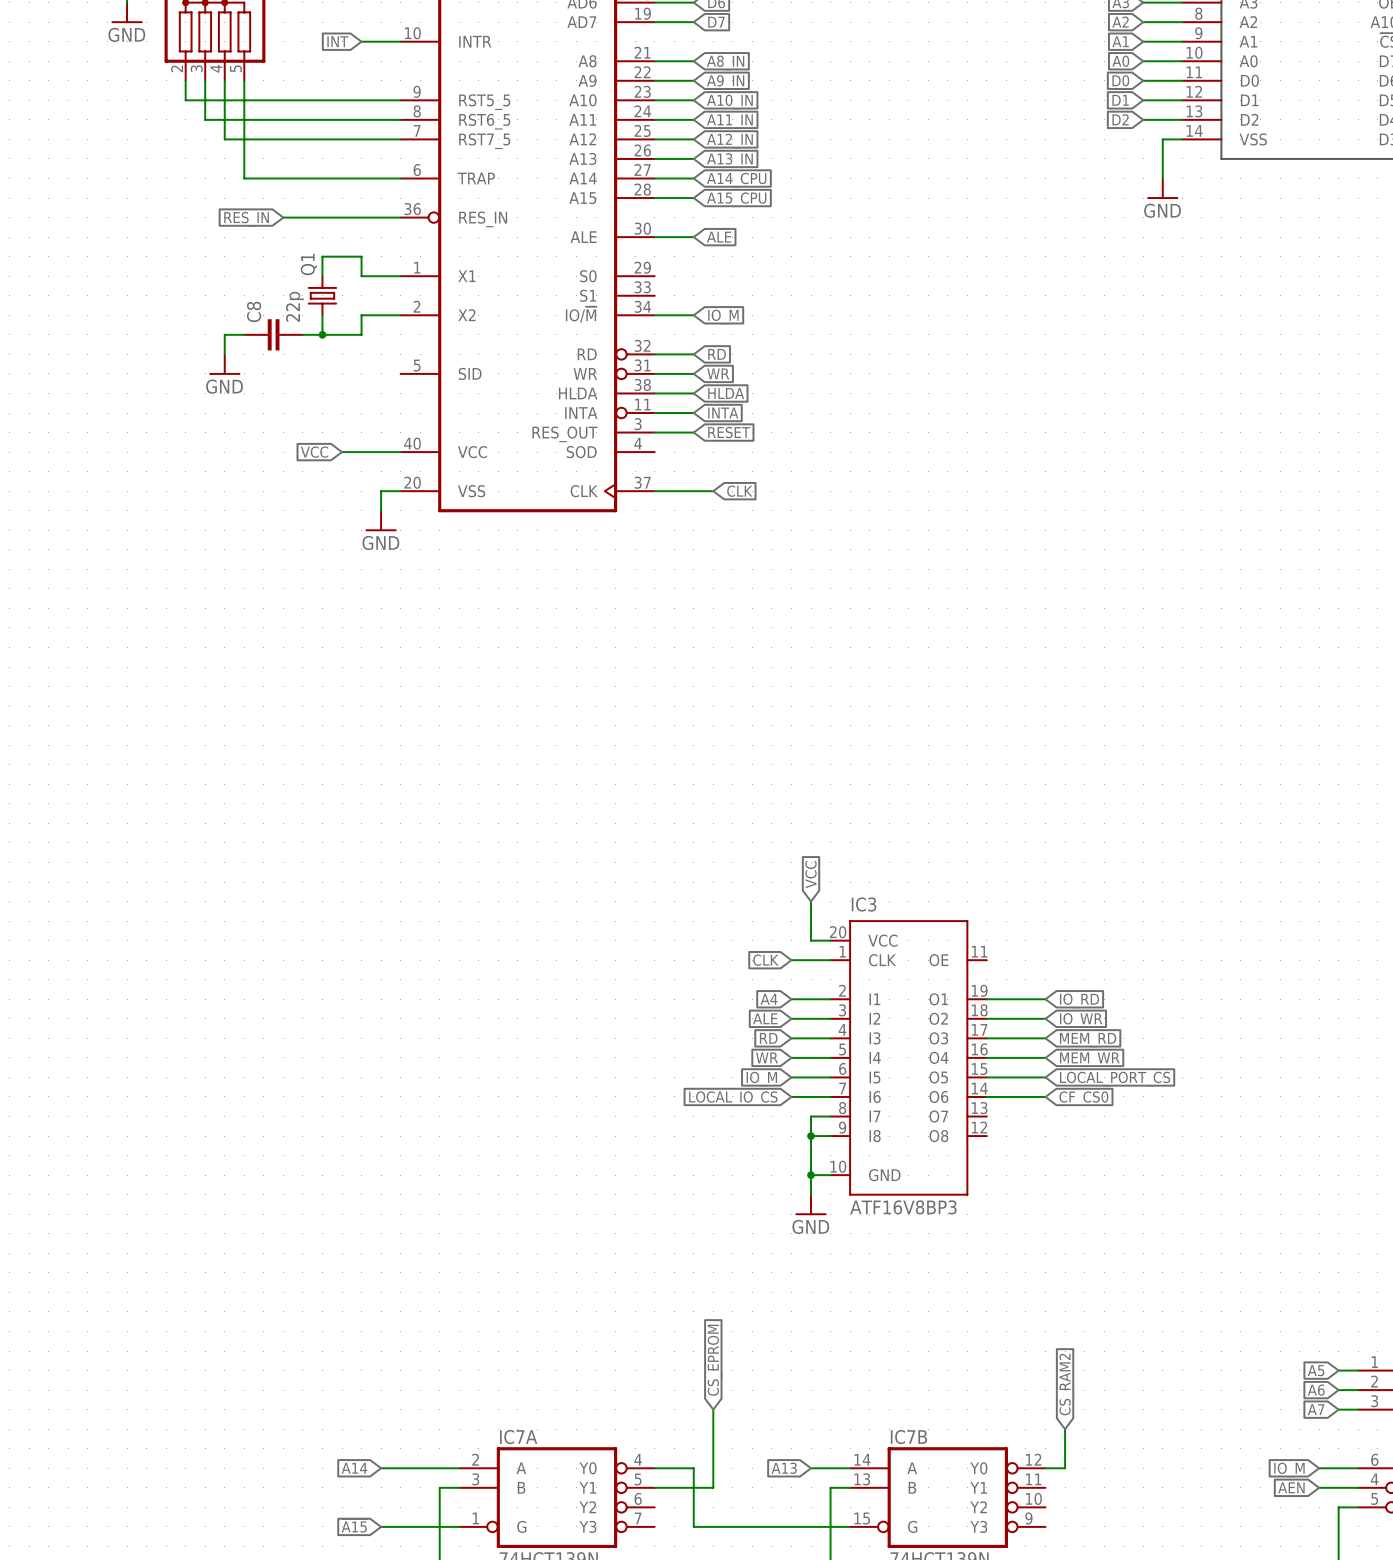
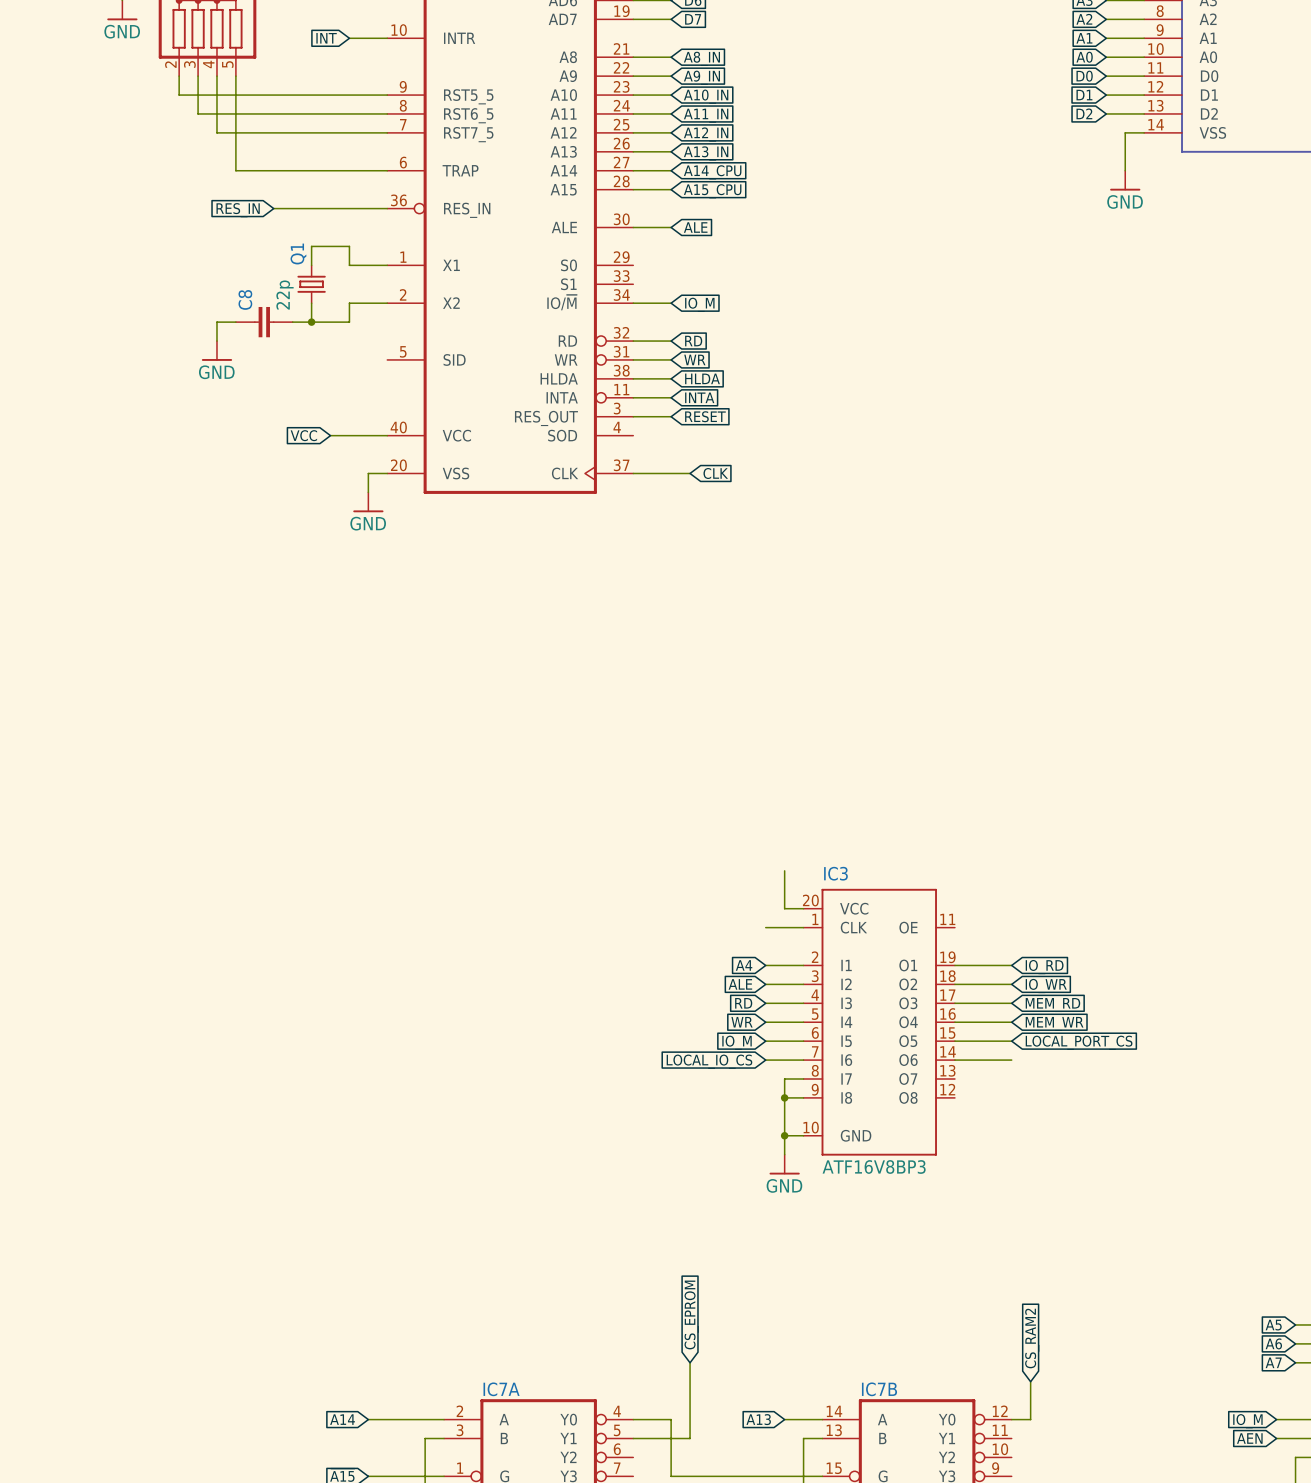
global label: VCC (811, 874) -> none
global label: CLK (765, 960) -> none
global label: CF_CS0 (1083, 1098) -> none

